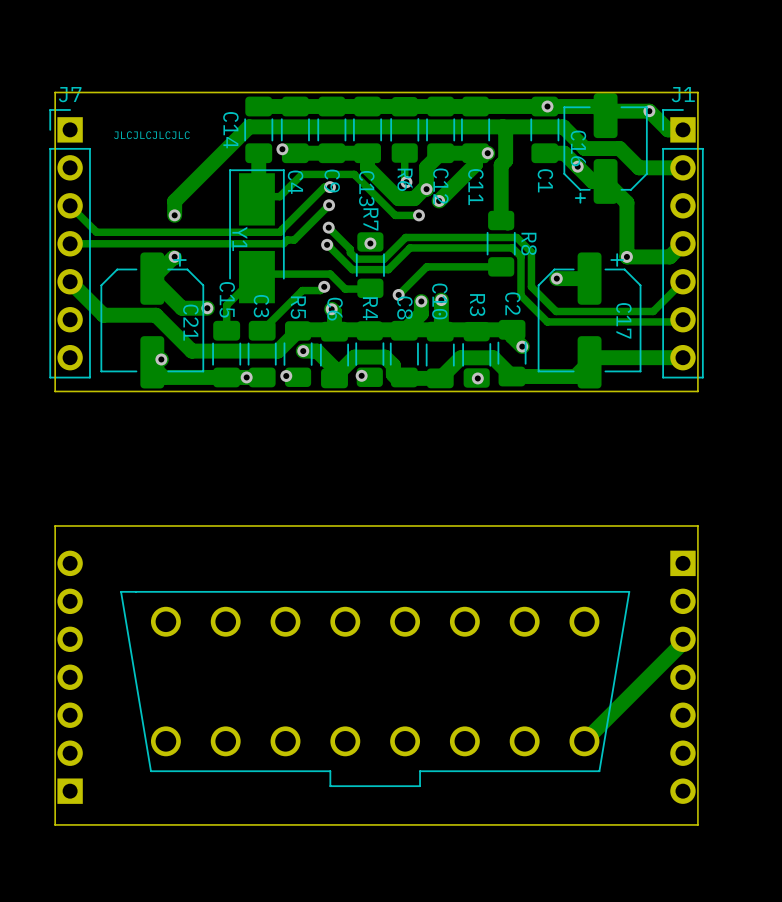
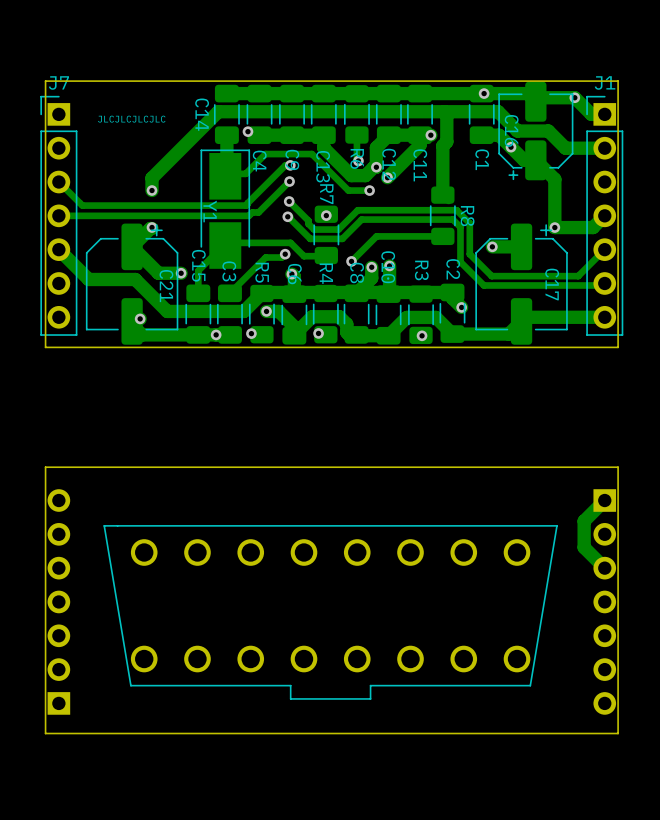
track: none -> (604, 500) (584, 521) (584, 547) (604, 568)
track: (682, 642) (584, 741) -> none

